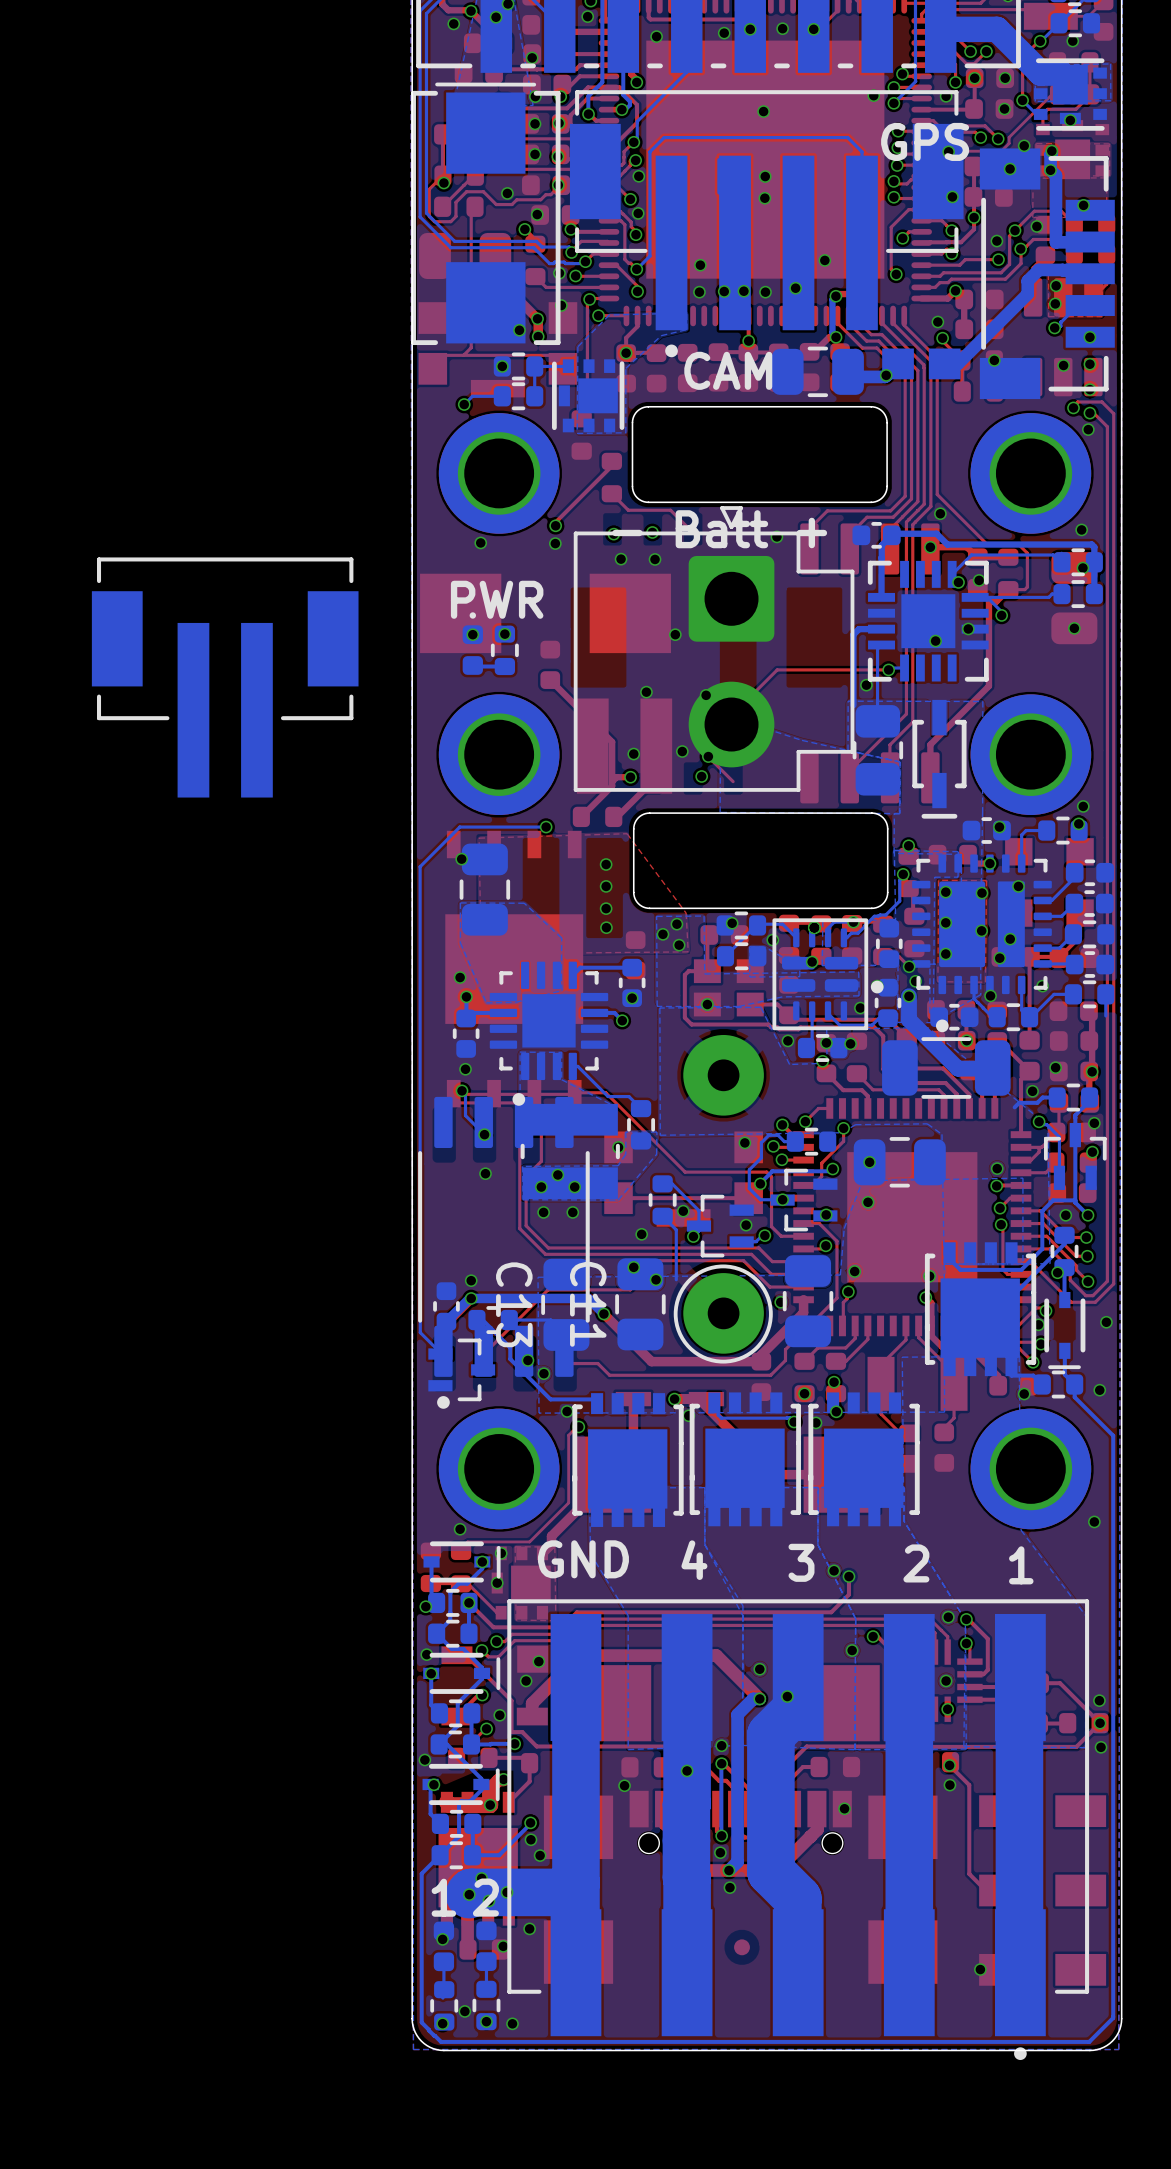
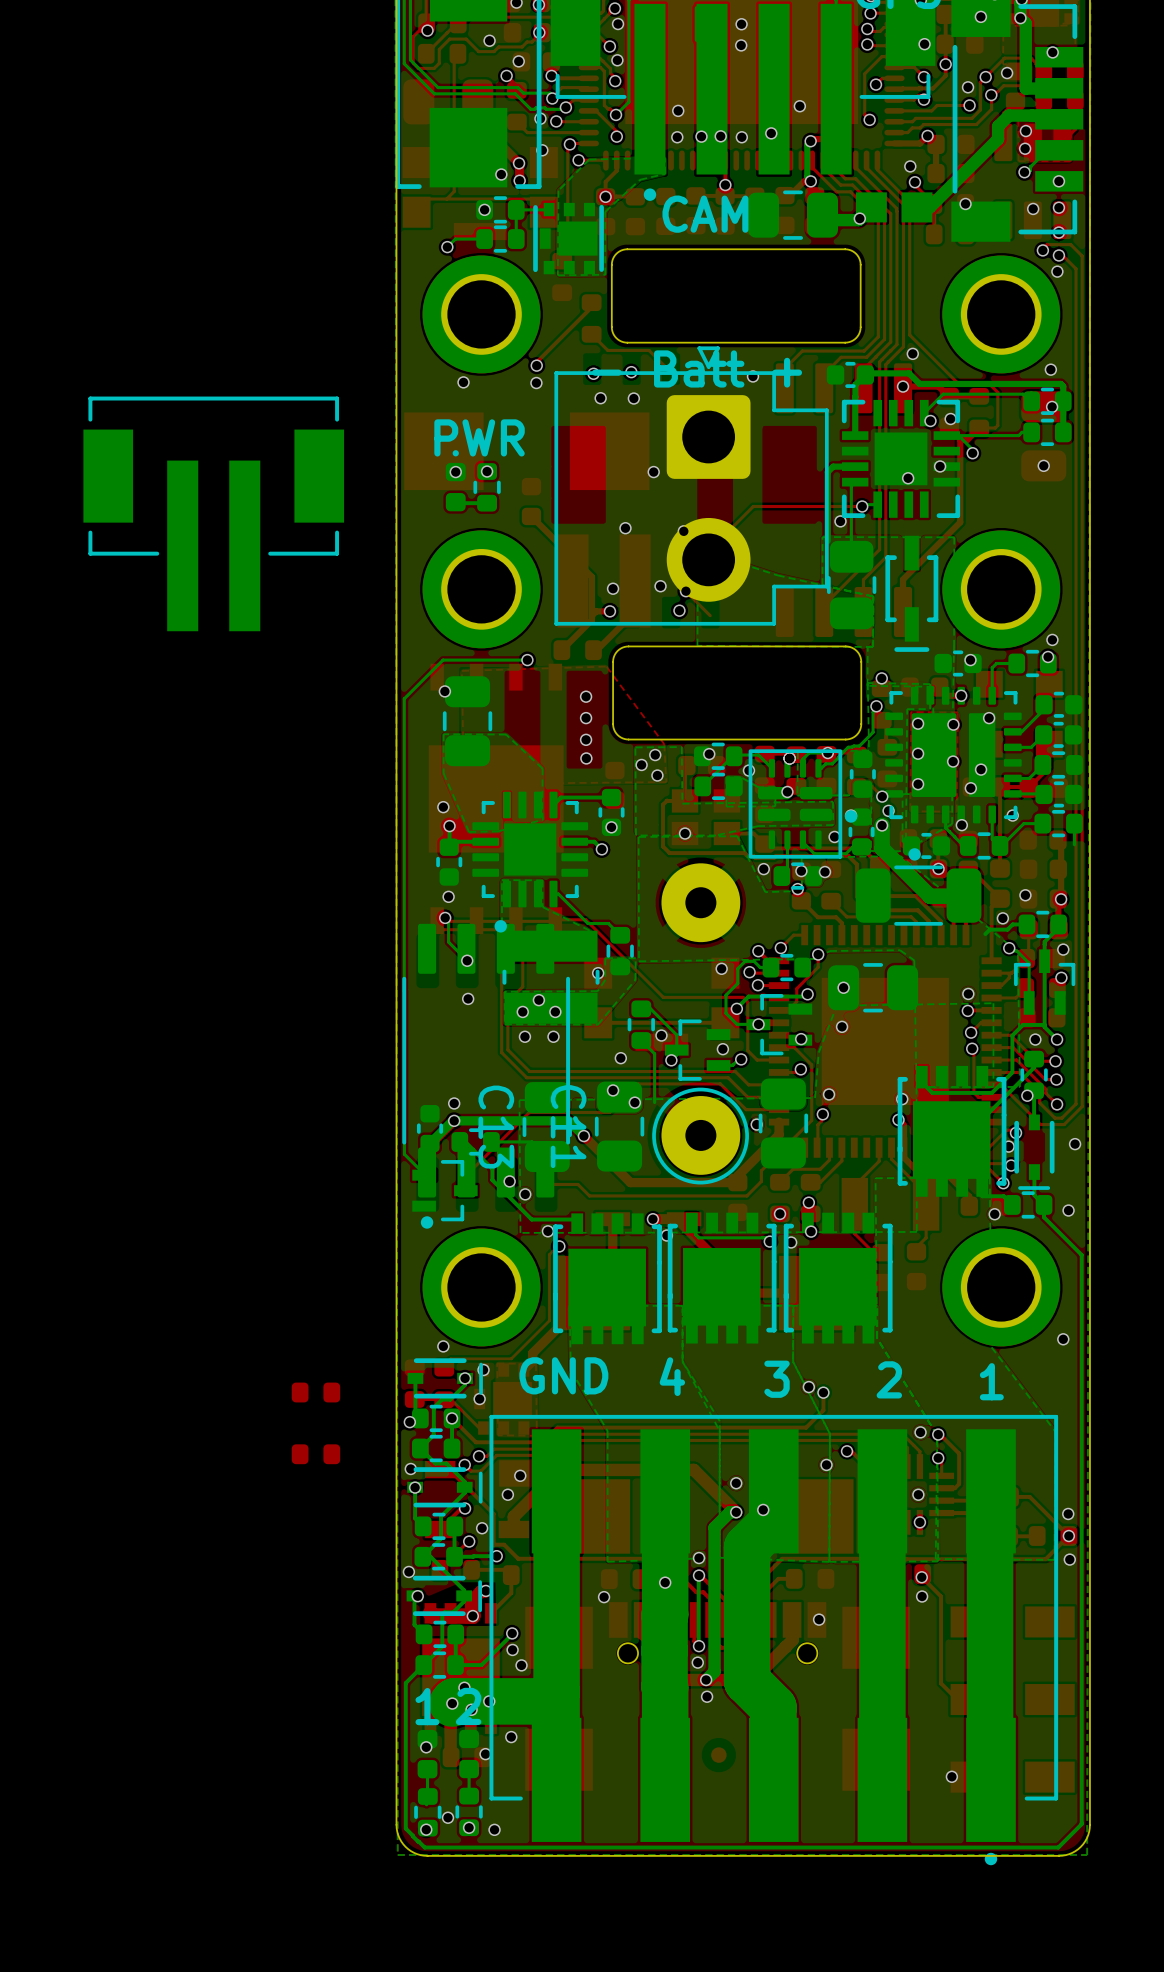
part: none -> (315, 1392)
part: none -> (315, 1454)

